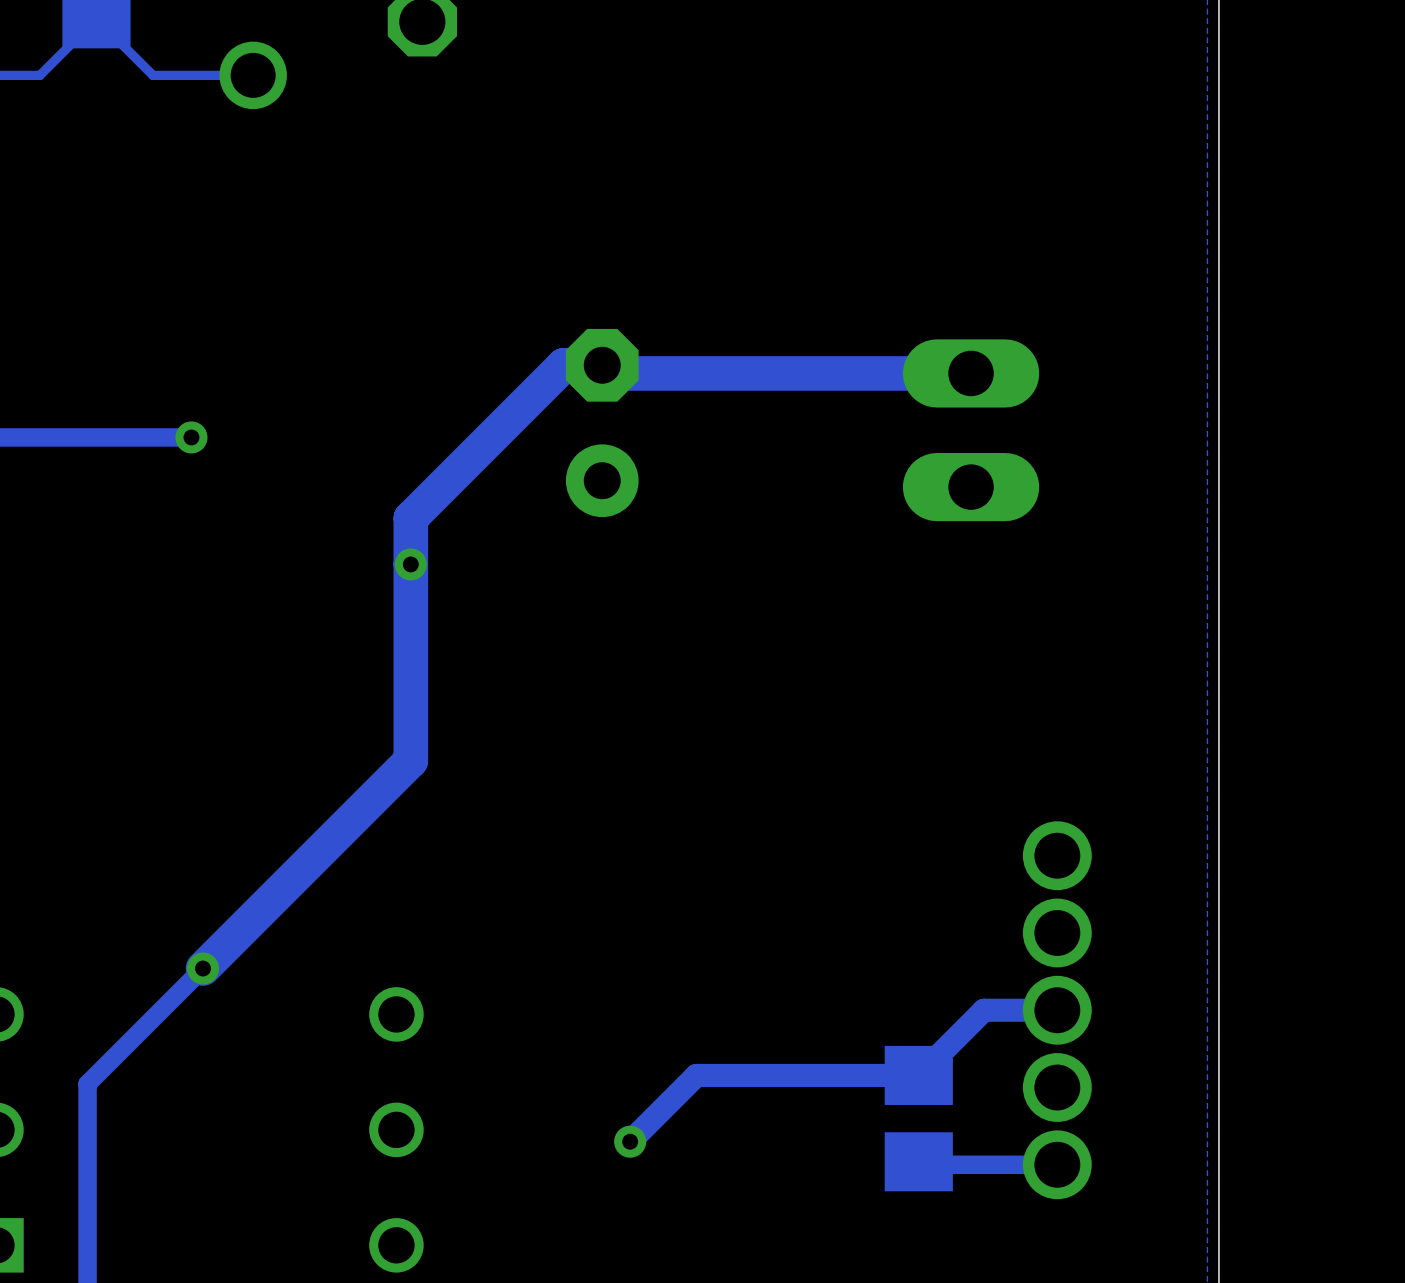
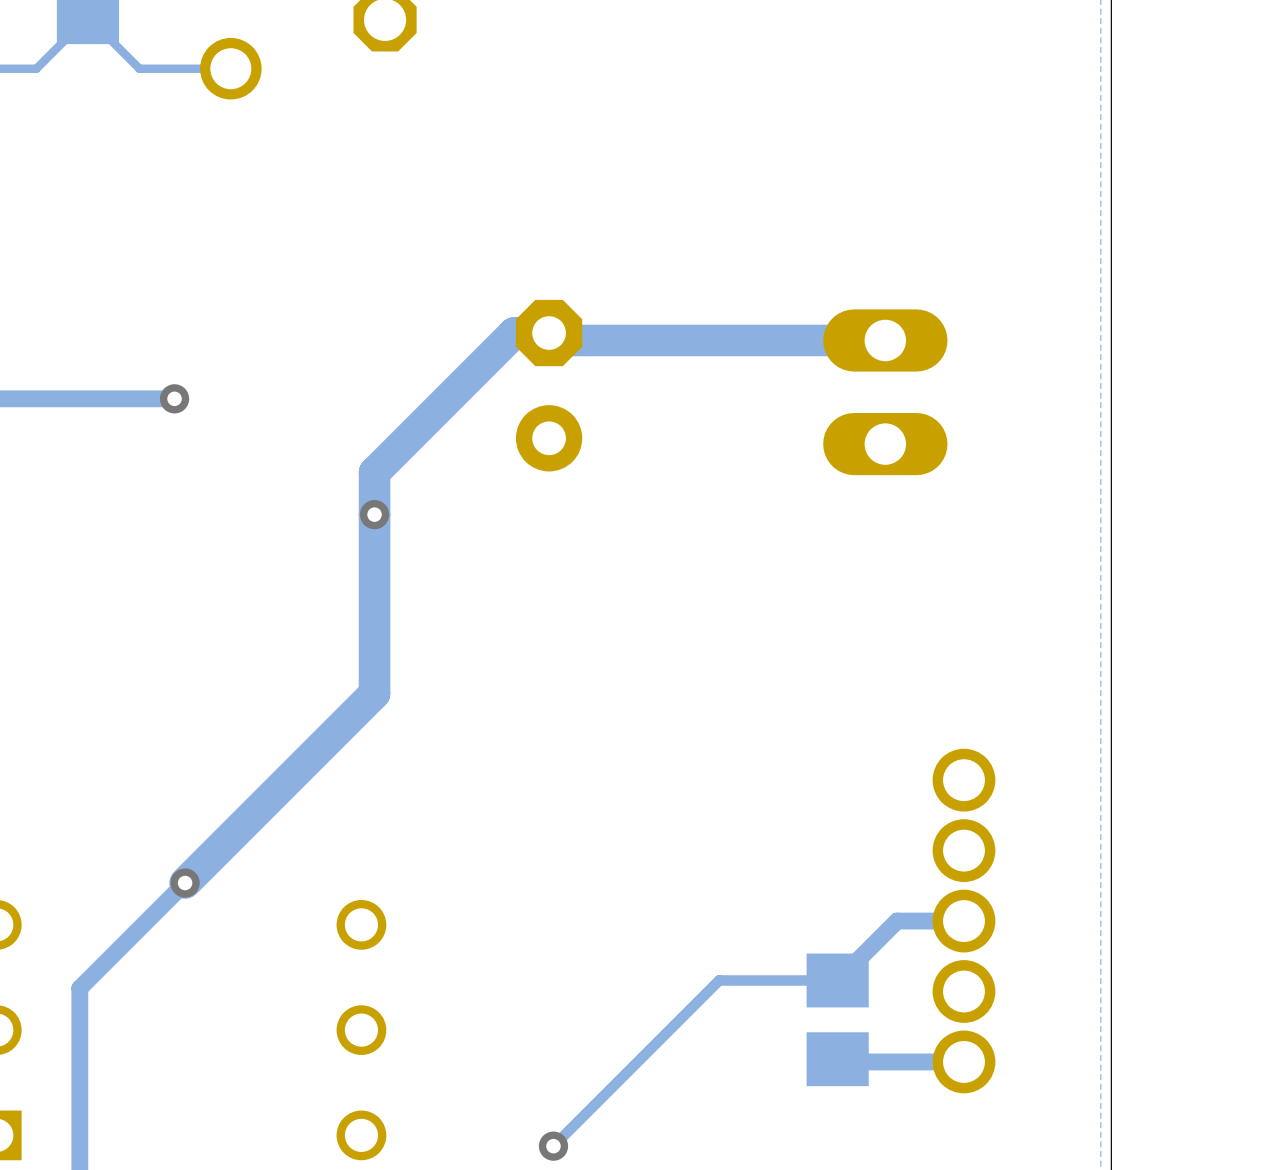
track width: thick (1057, 1010) (983, 1010) (918, 1075) (788, 1075) -> thin (963, 921) (897, 921) (837, 980) (719, 980)
track: (788, 1075) (696, 1075) (630, 1141) -> (719, 980) (553, 1146)
via position: (630, 1141) -> (553, 1146)

